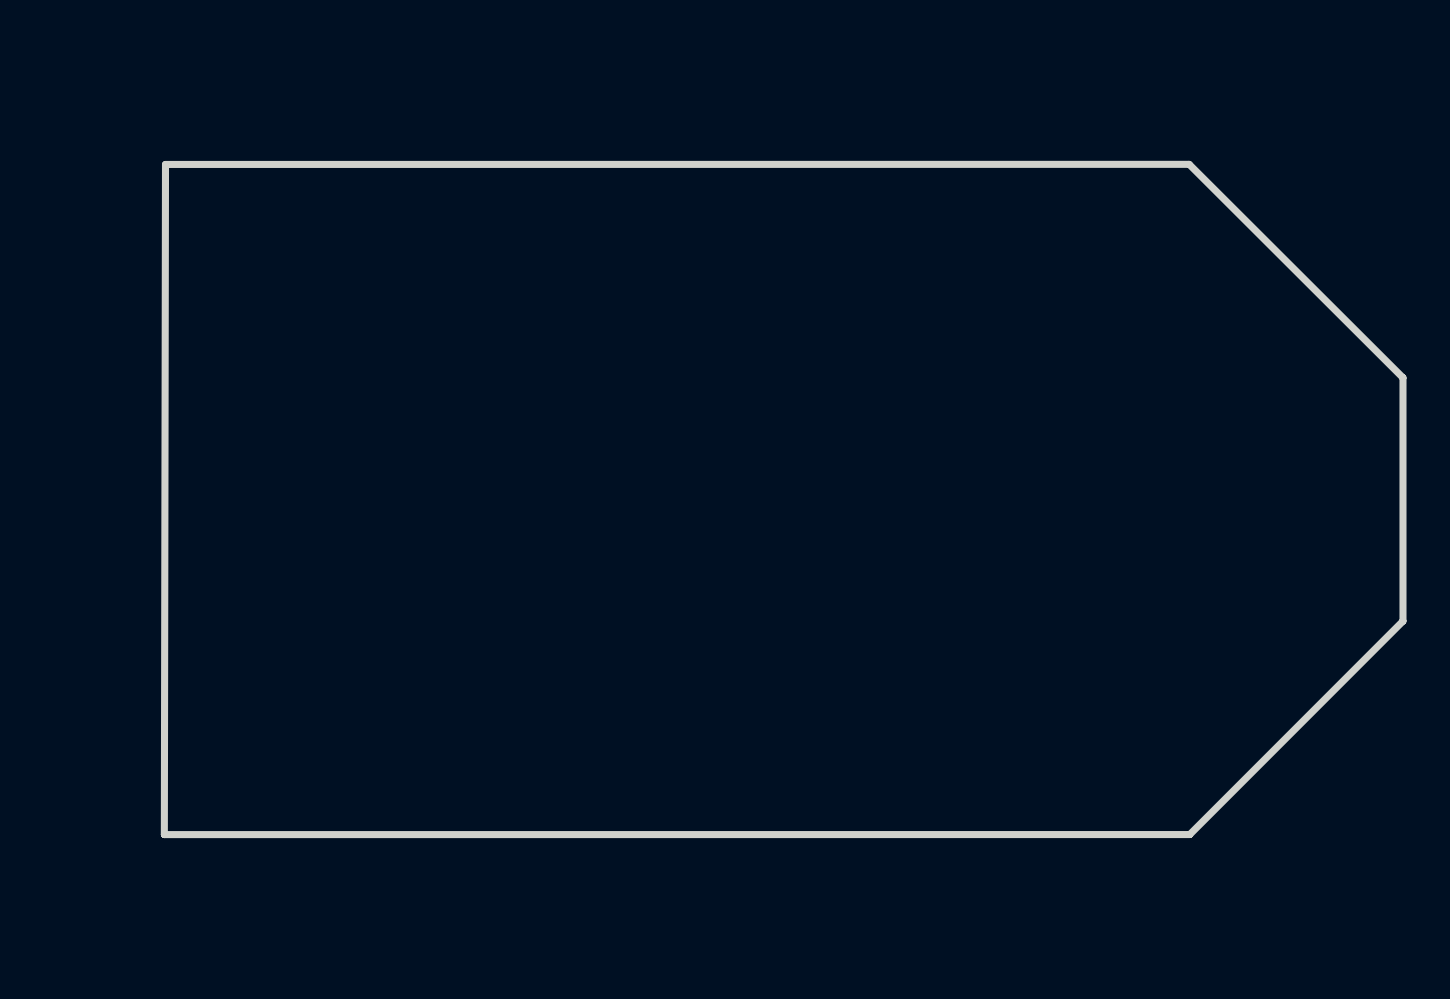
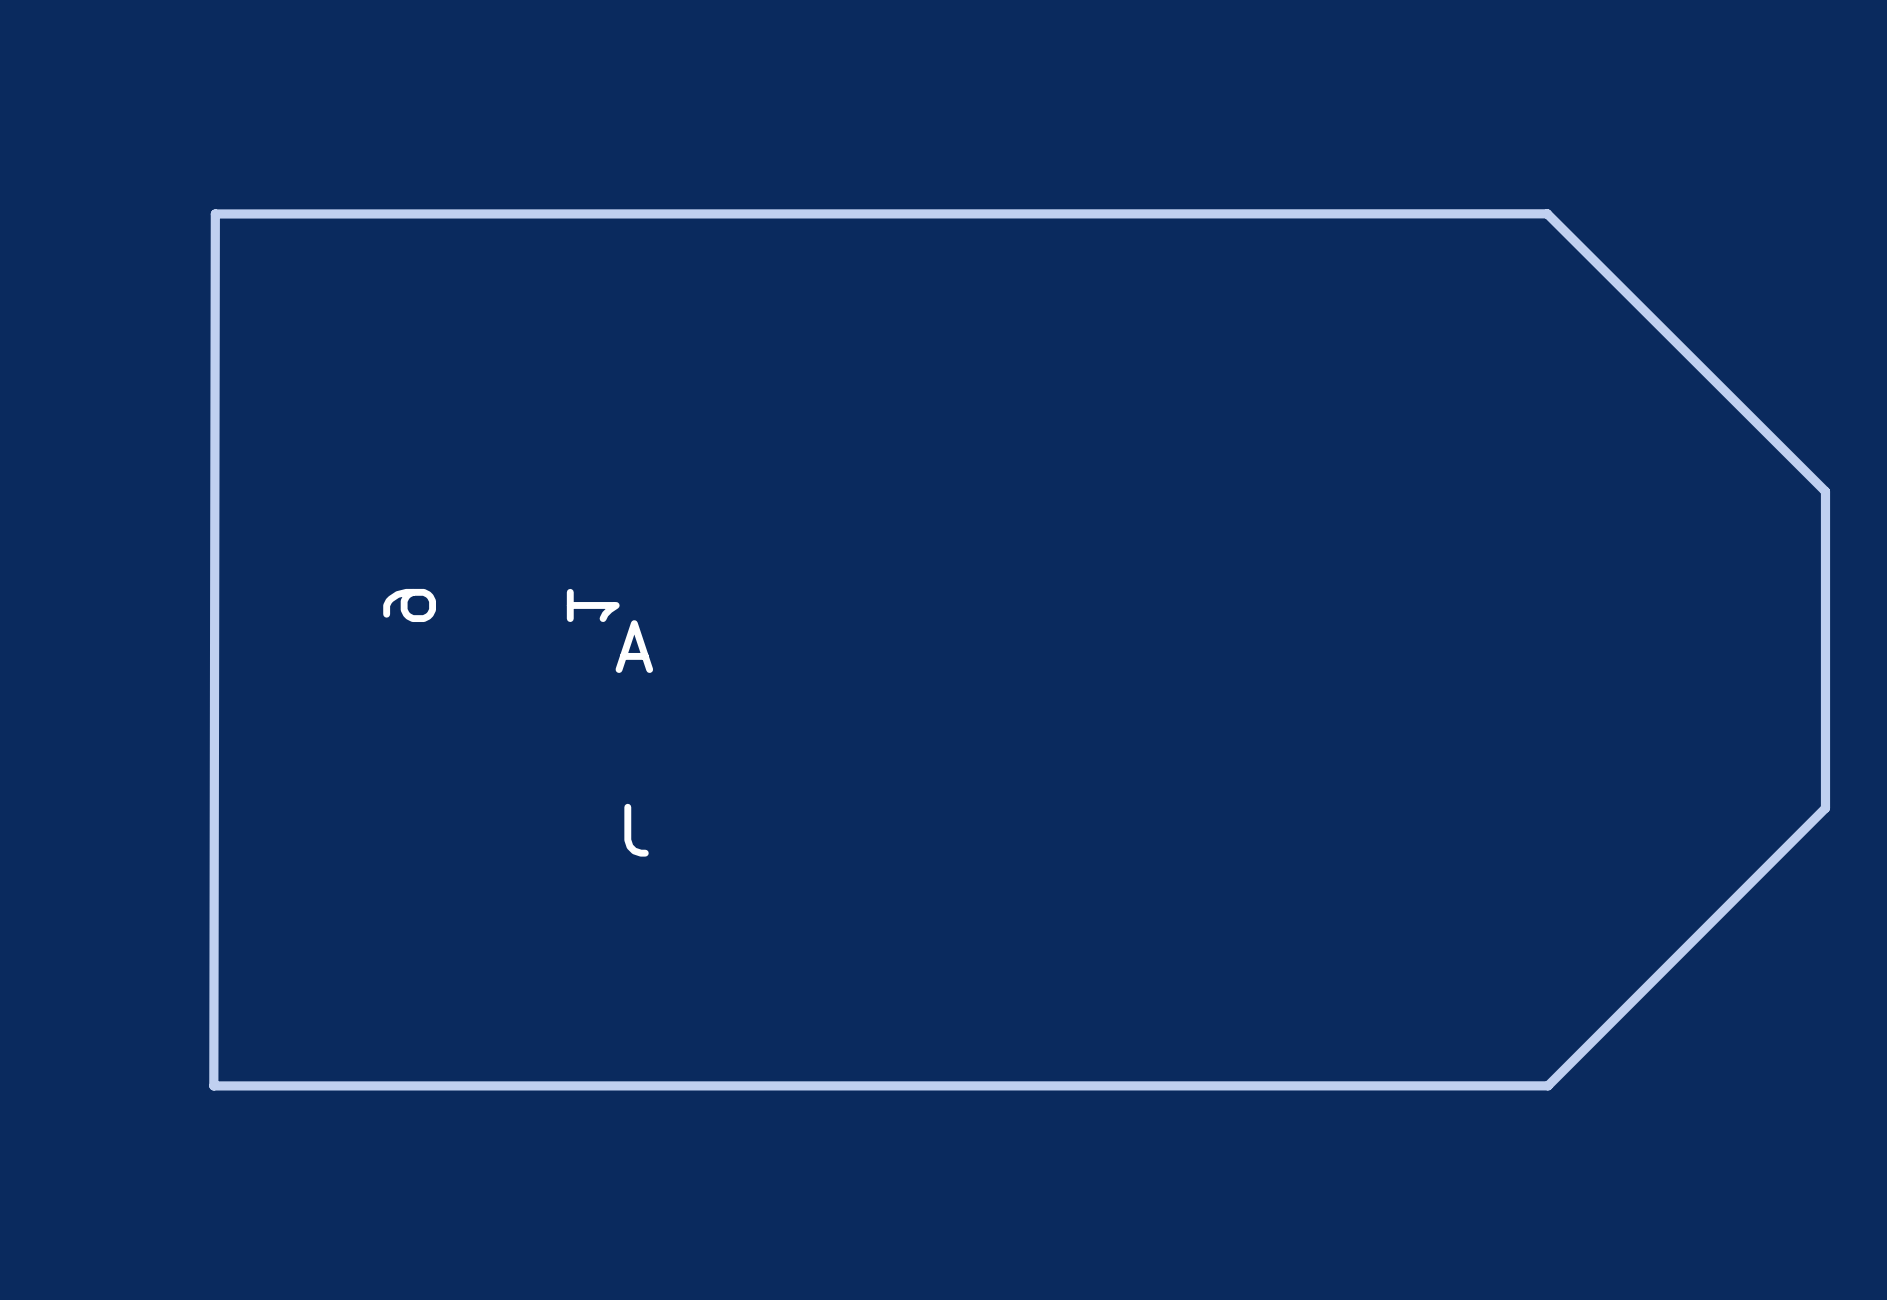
part: none -> (518, 722)

